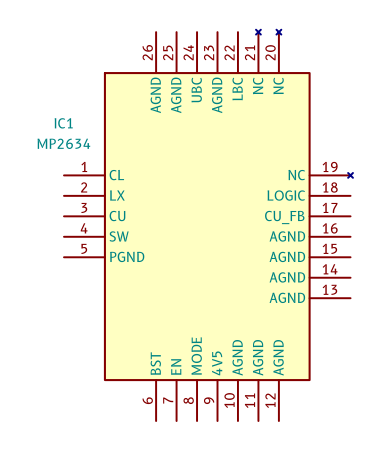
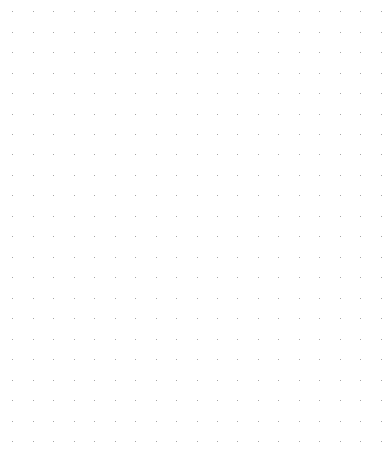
IC1: MP2634 (208, 225) -> none

